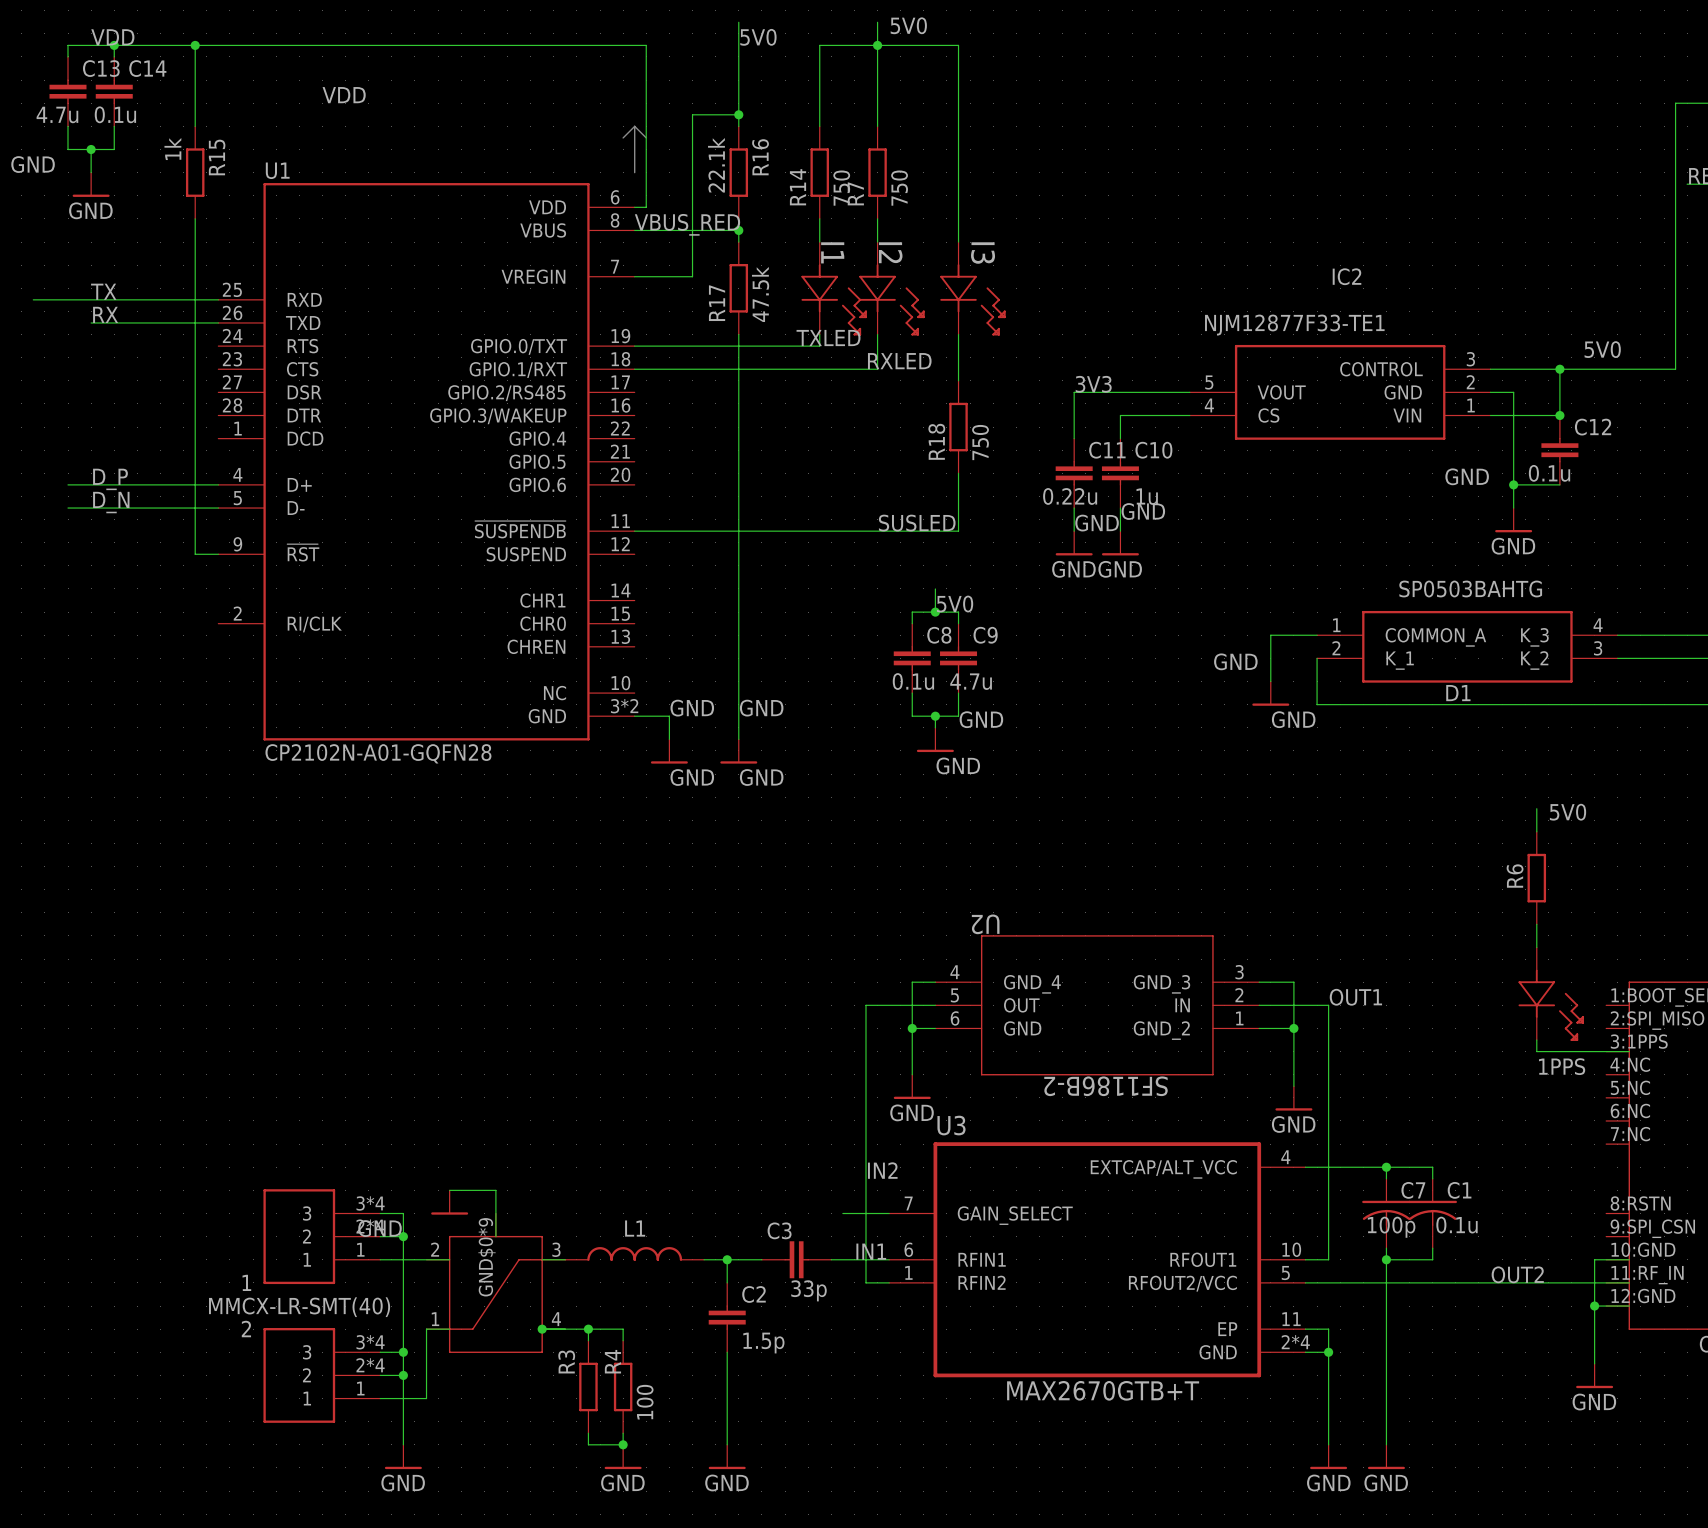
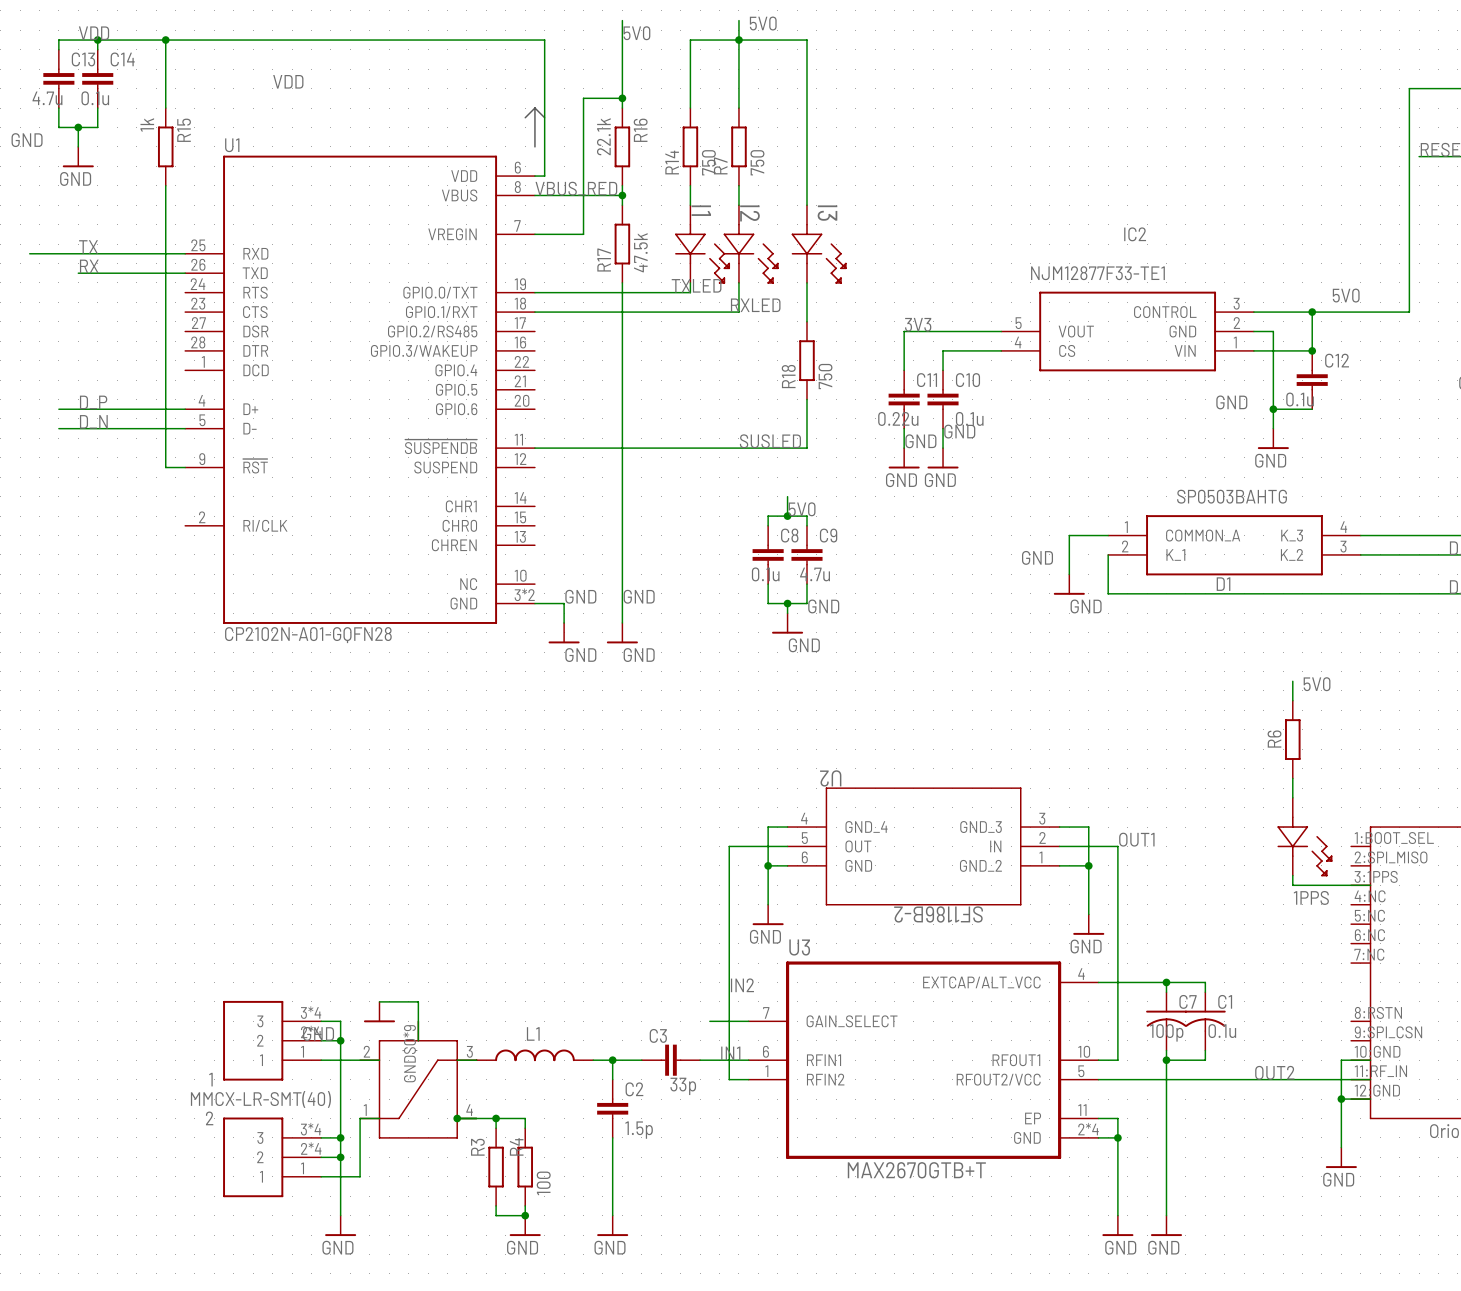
C10 value: 1u (1147, 496) -> 0.1u (969, 418)

